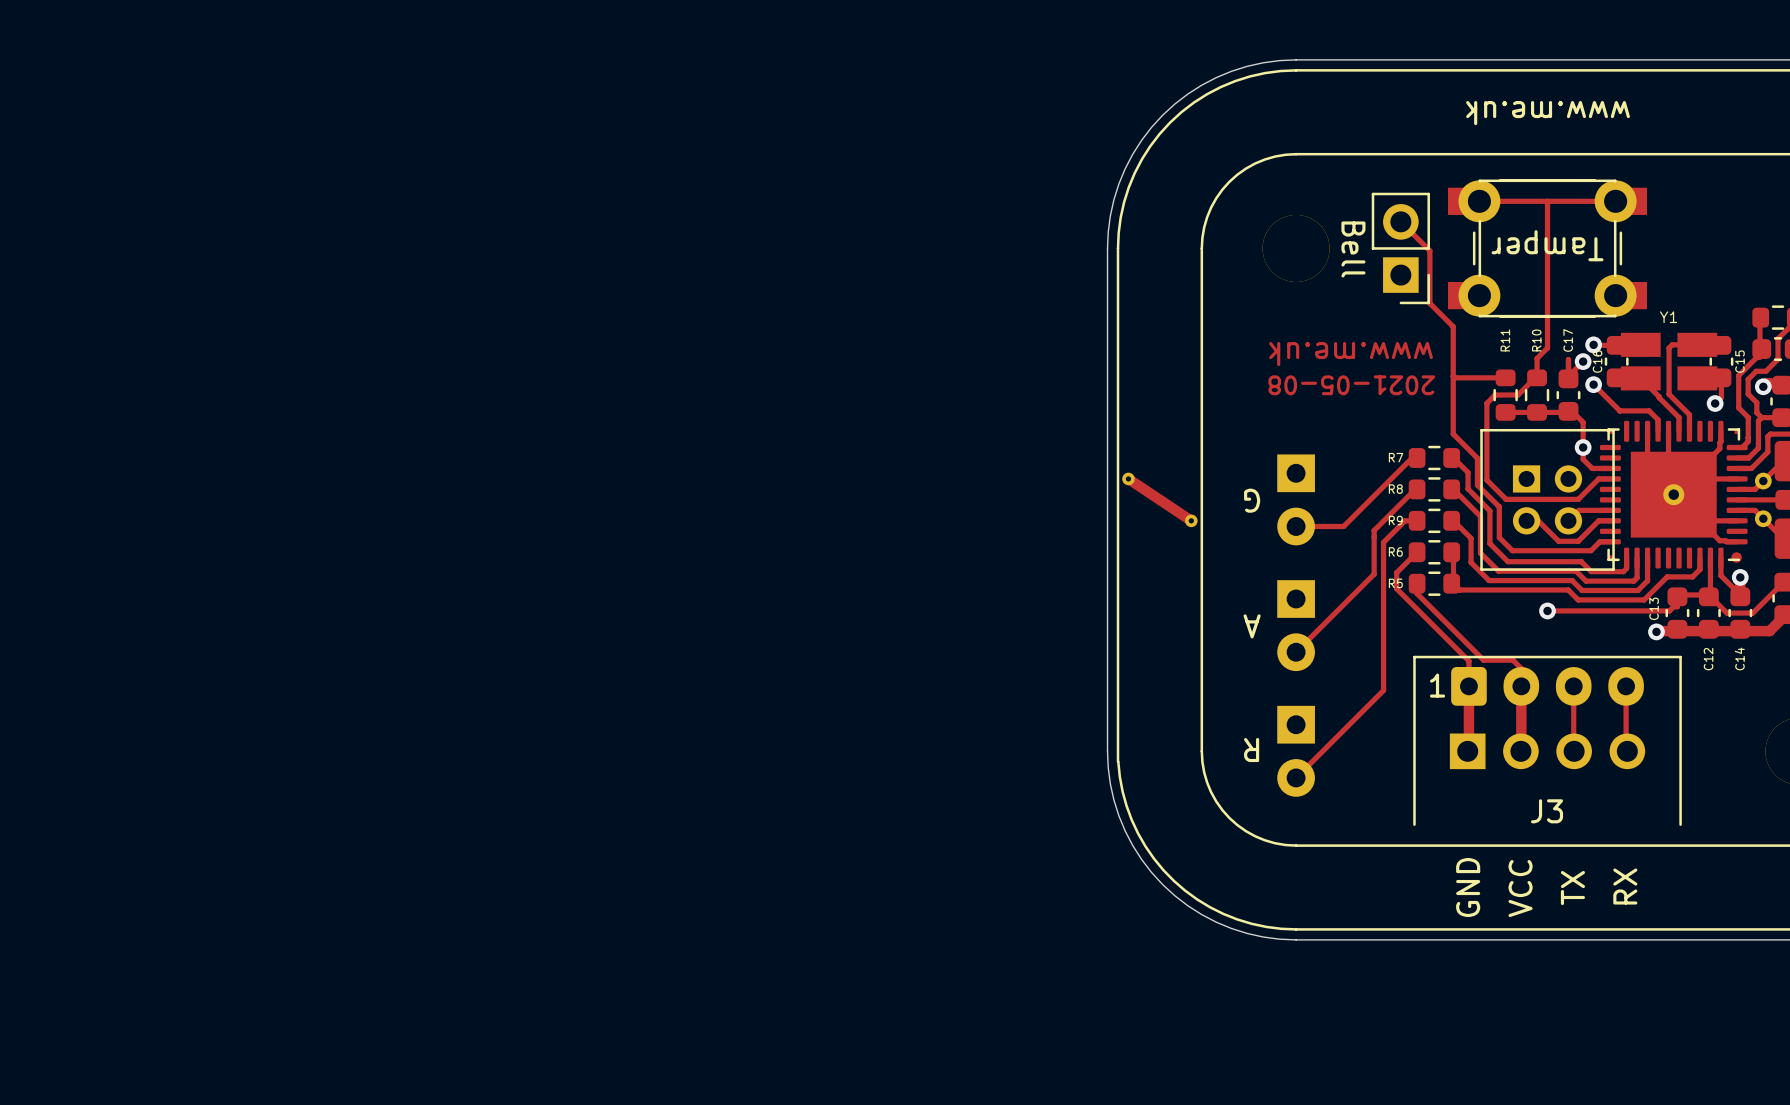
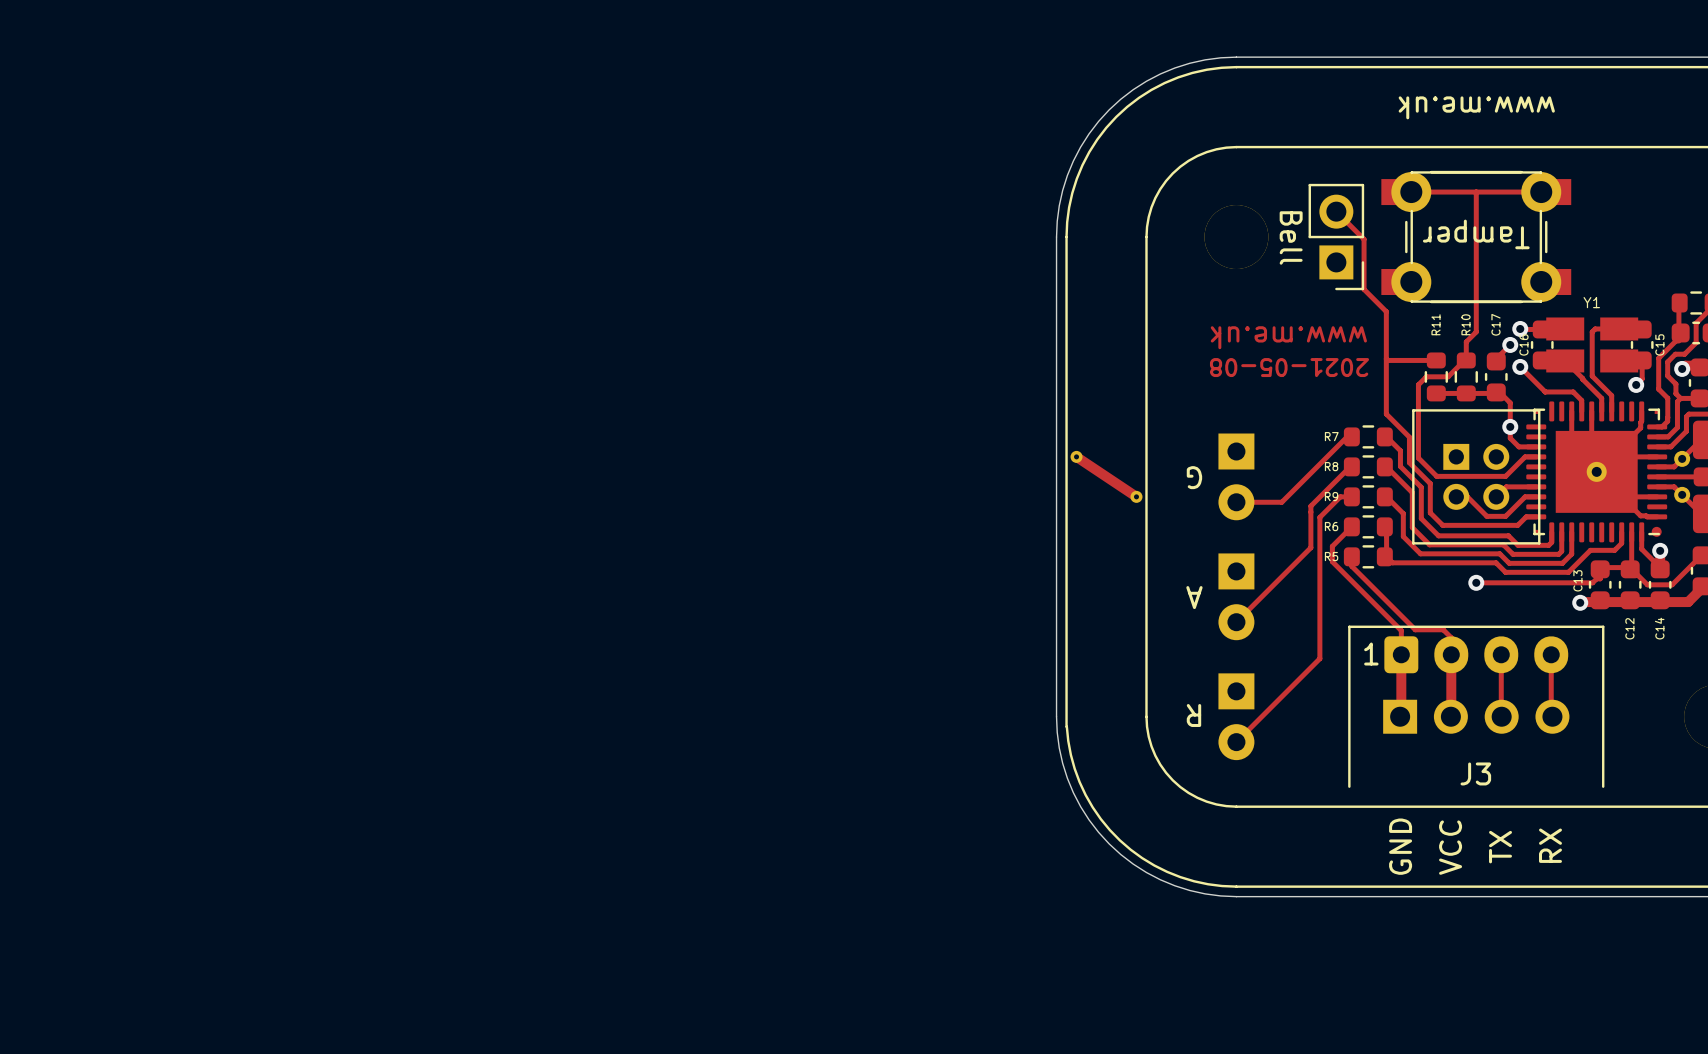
track: (1568, 359) (1568, 376) -> none

